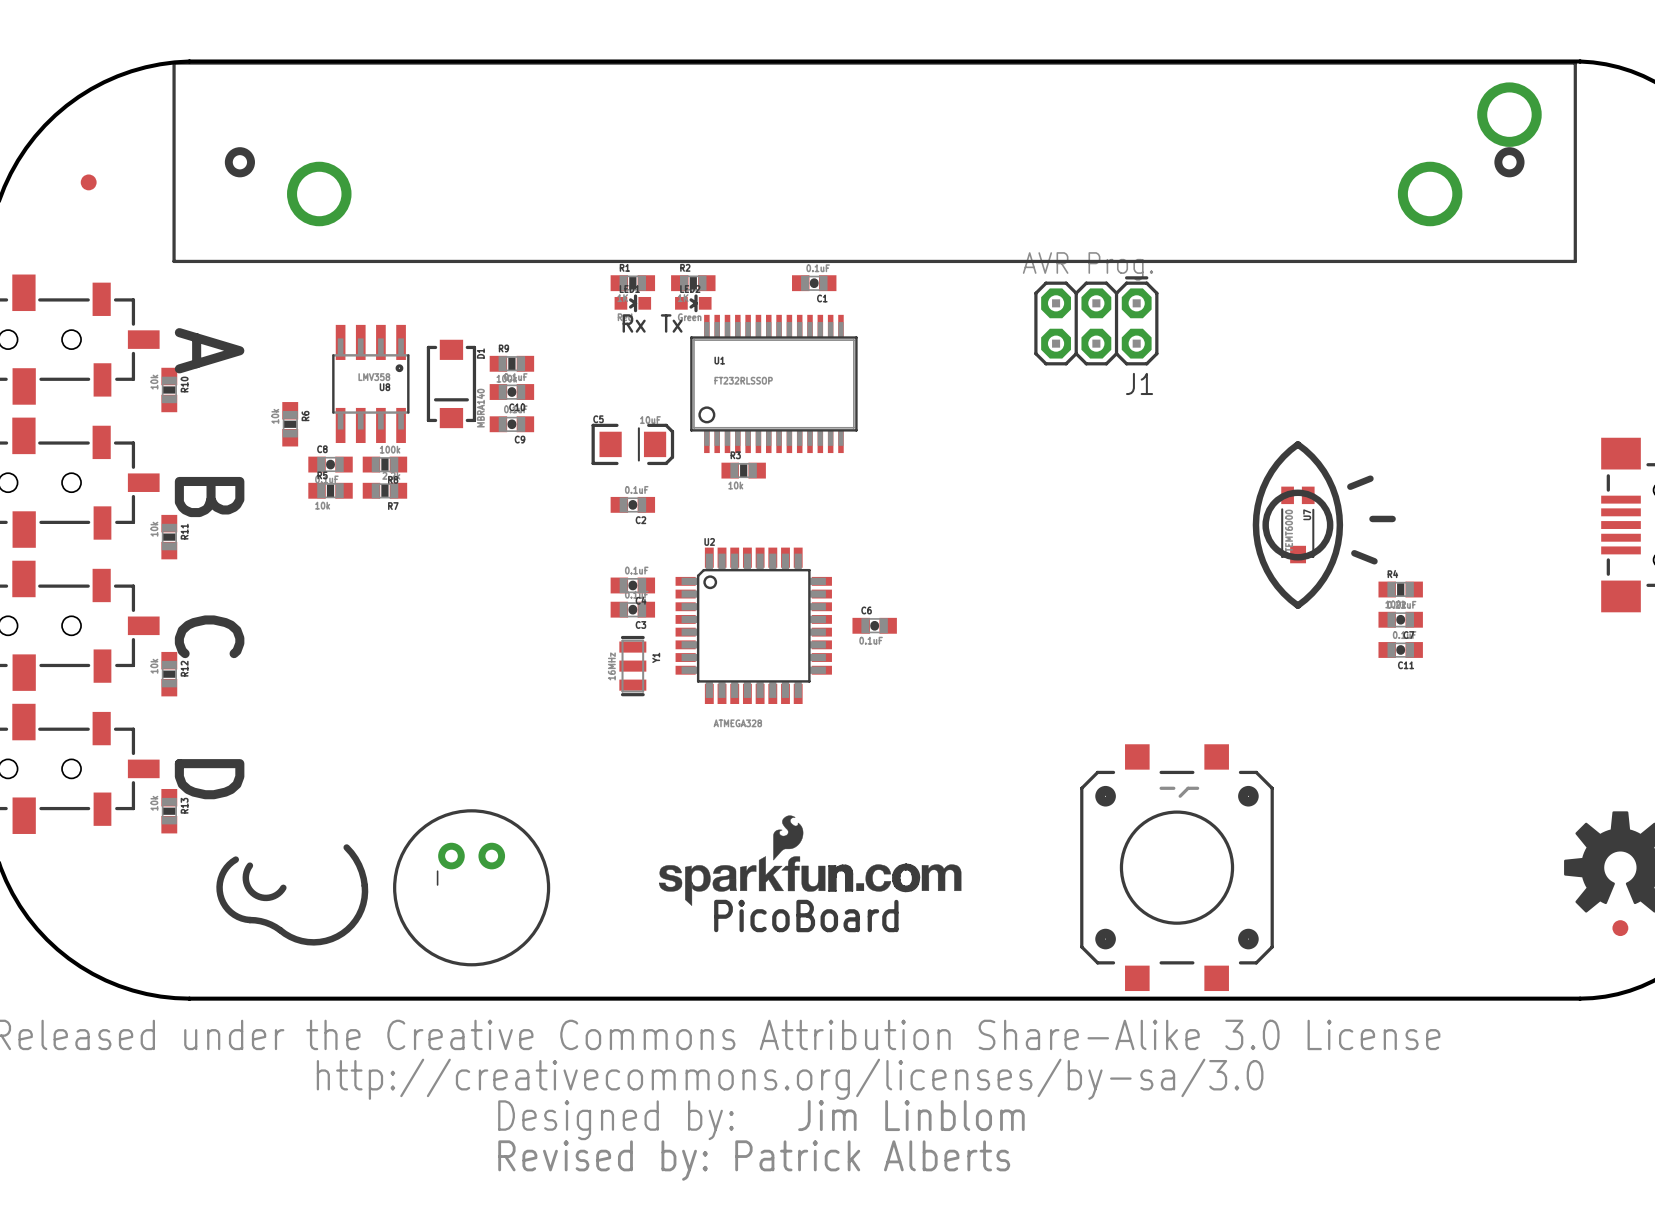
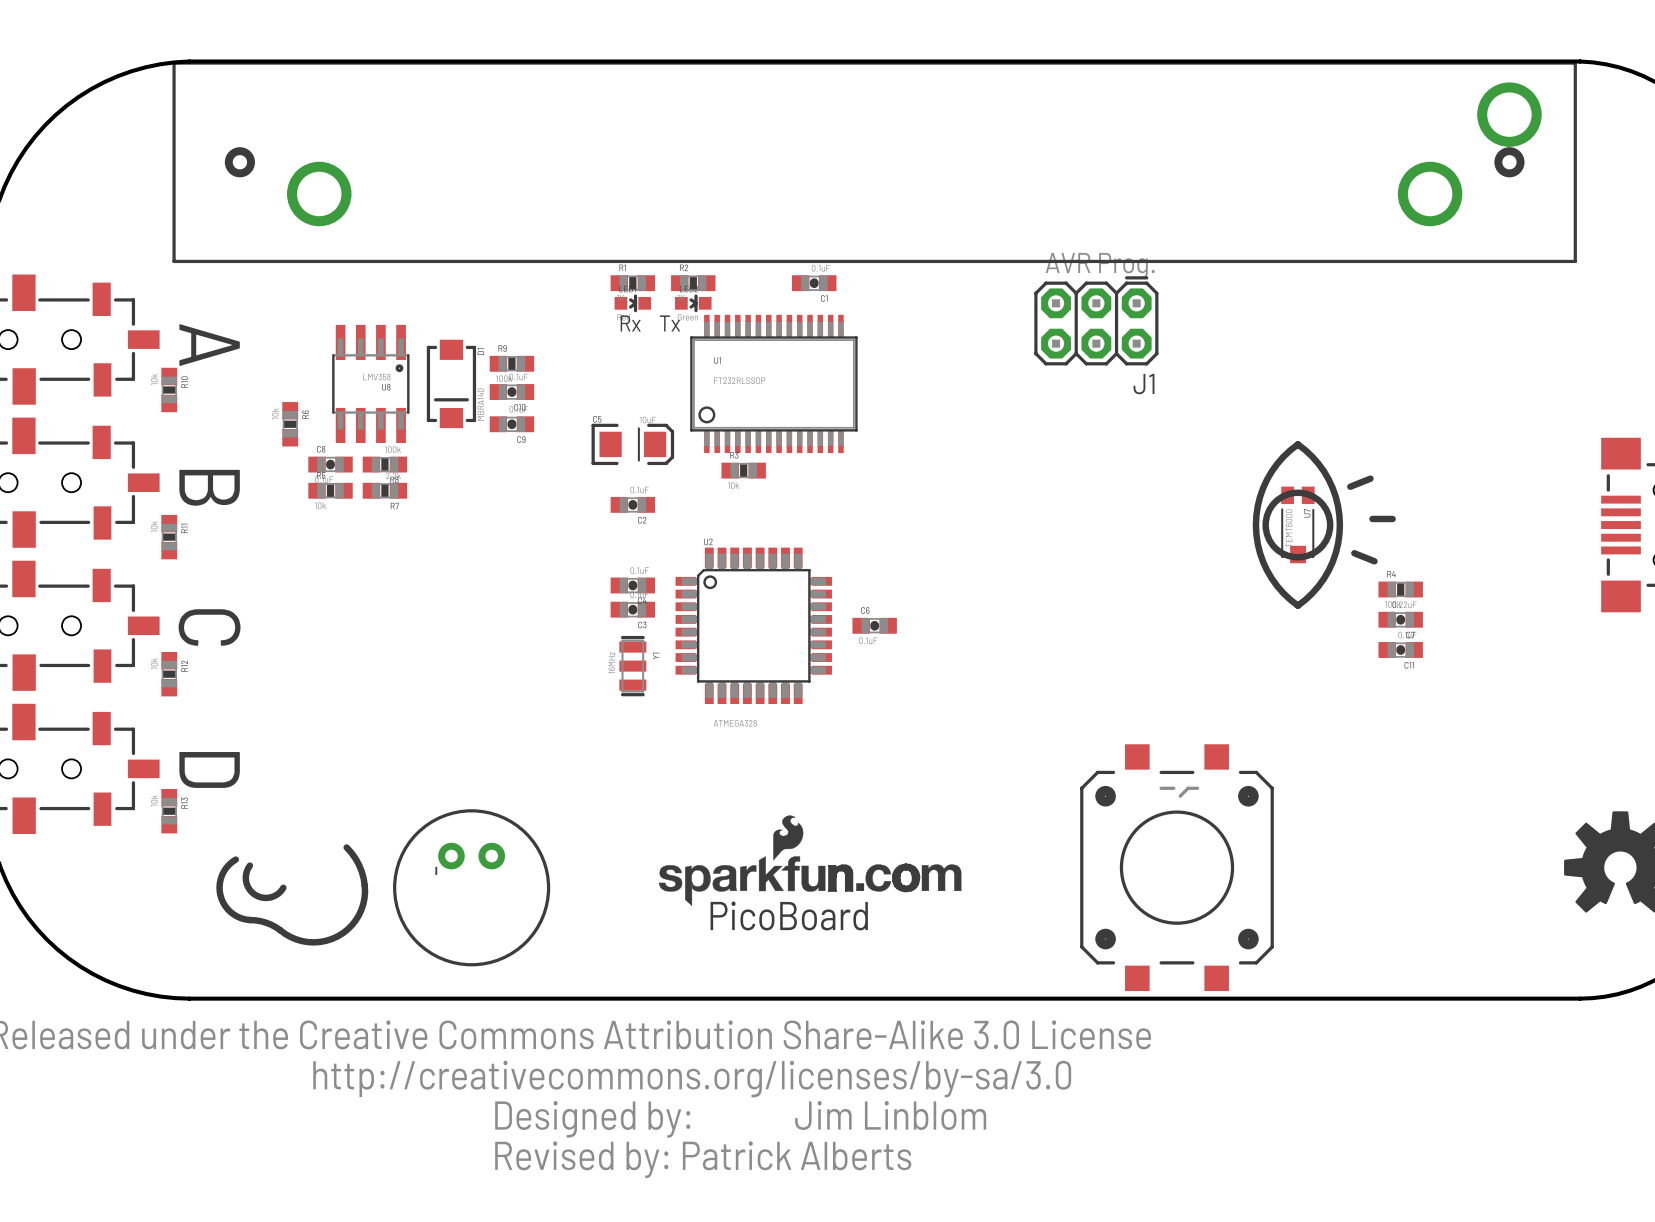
part: (88, 182) -> none
part: (1620, 928) -> none

